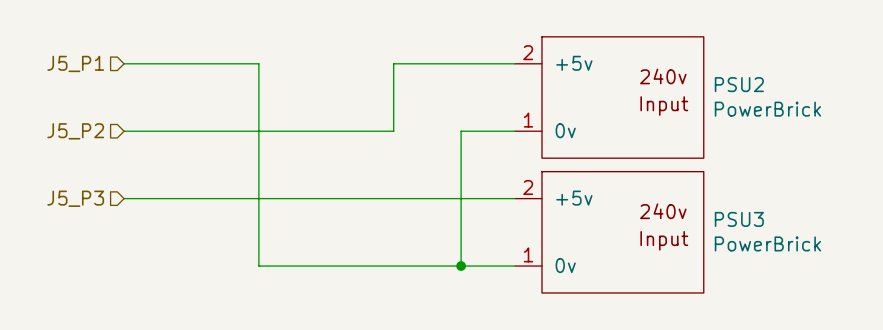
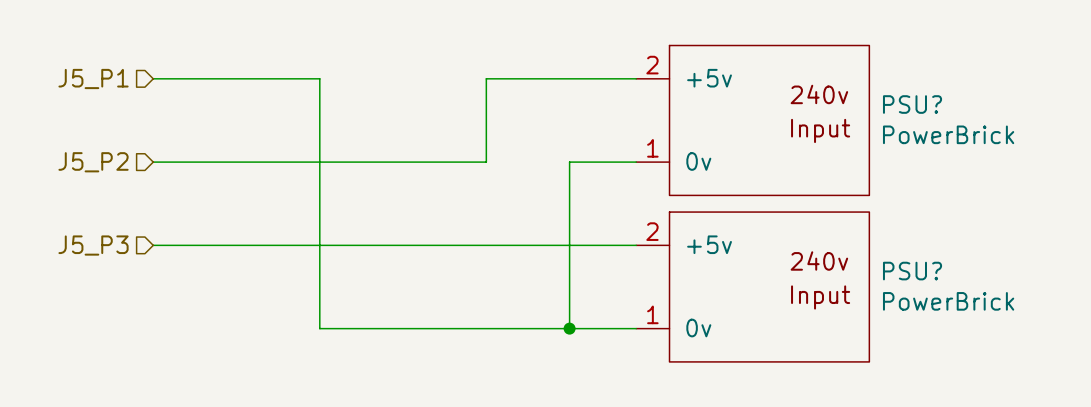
PSU2 name: PSU2 (739, 84) -> PSU? (912, 104)
PSU3 name: PSU3 (739, 219) -> PSU? (912, 271)

